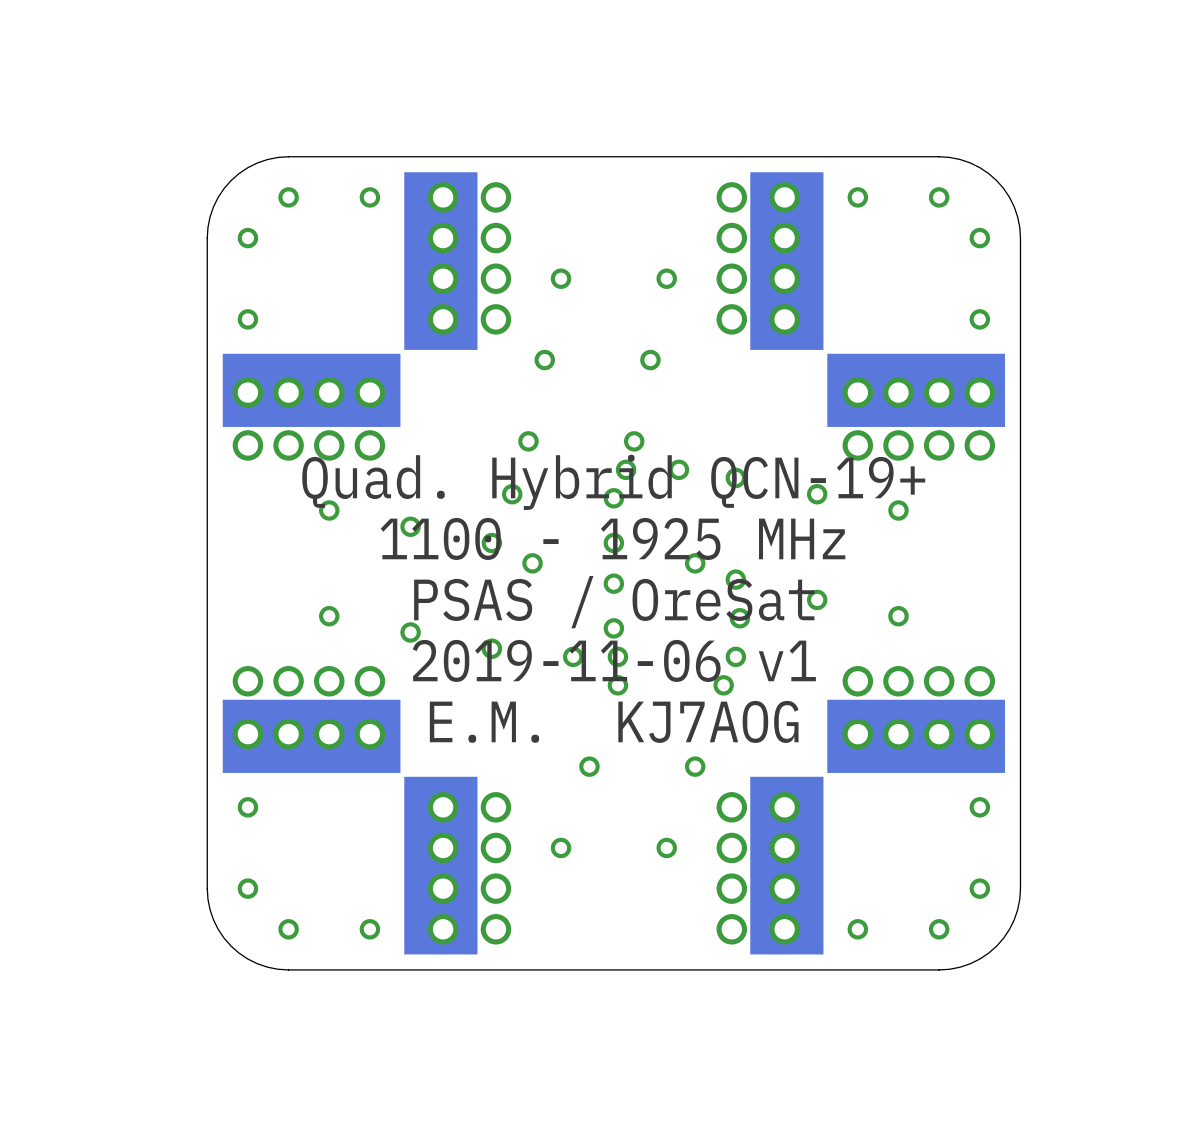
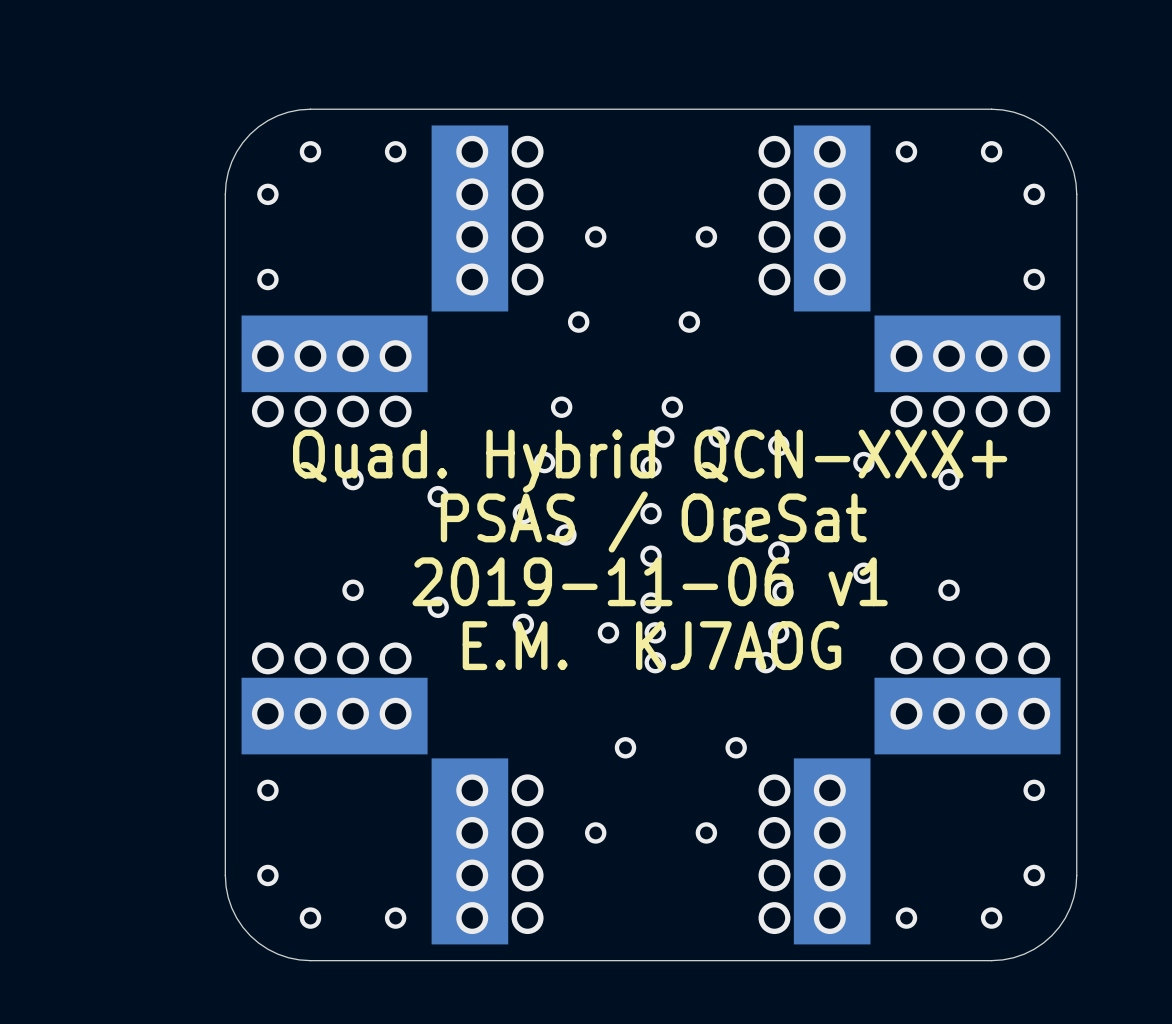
text: Quad. Hybrid QCN-19+ (613, 482) -> Quad. Hybrid QCN-XXX+ (650, 461)
text: 1100 - 1925 MHz (613, 538) -> none
text position: PSAS / OreSat (614, 602) -> PSAS / OreSat (653, 521)
text position: 2019-11-06 v1 (614, 660) -> 2019-11-06 v1 (650, 581)
text position: E.M. KJ7AOG (614, 721) -> E.M. KJ7AOG (651, 645)

